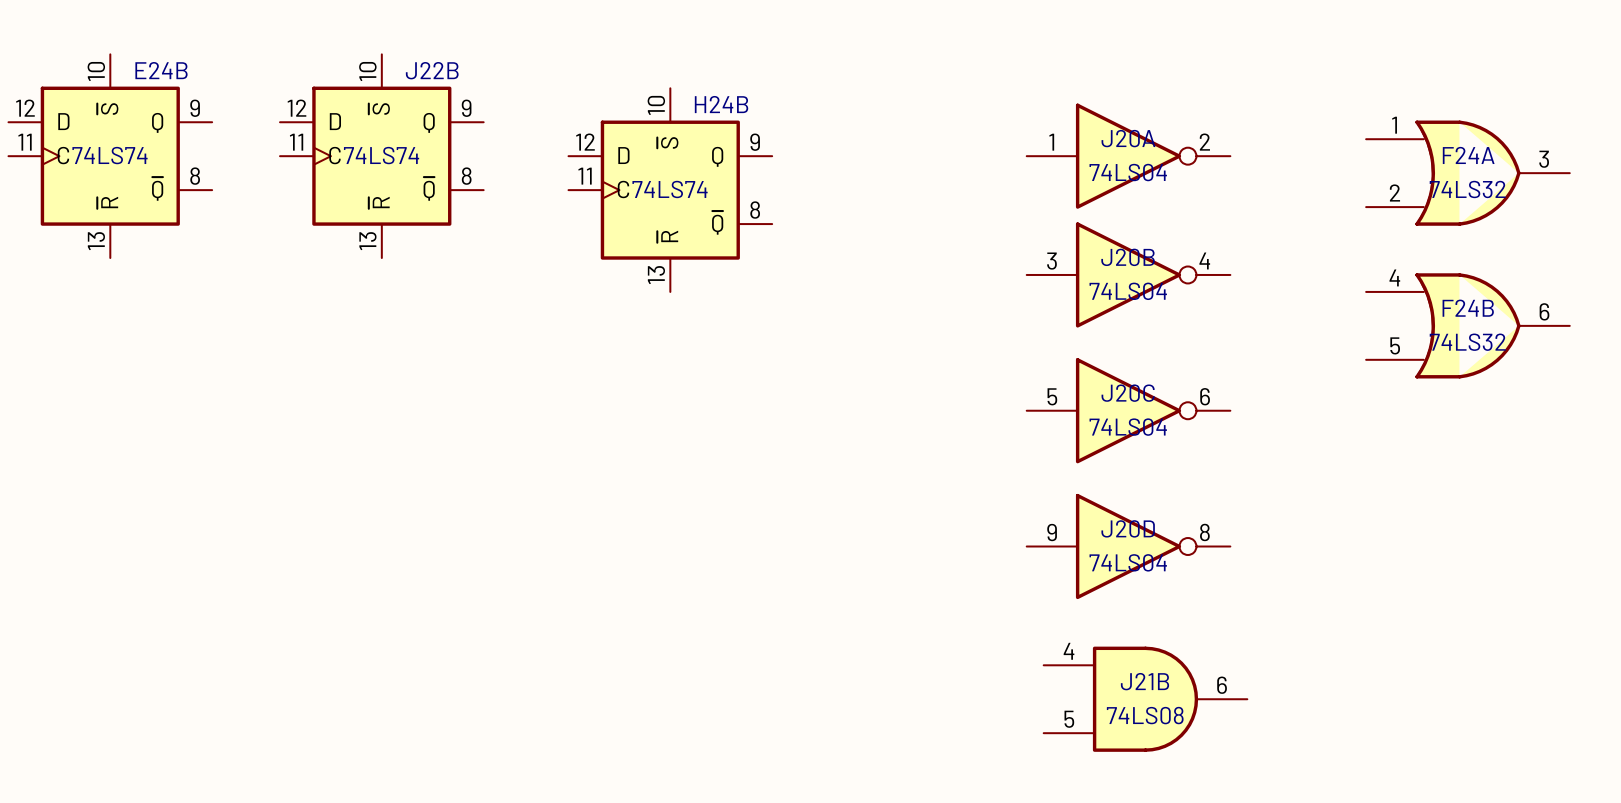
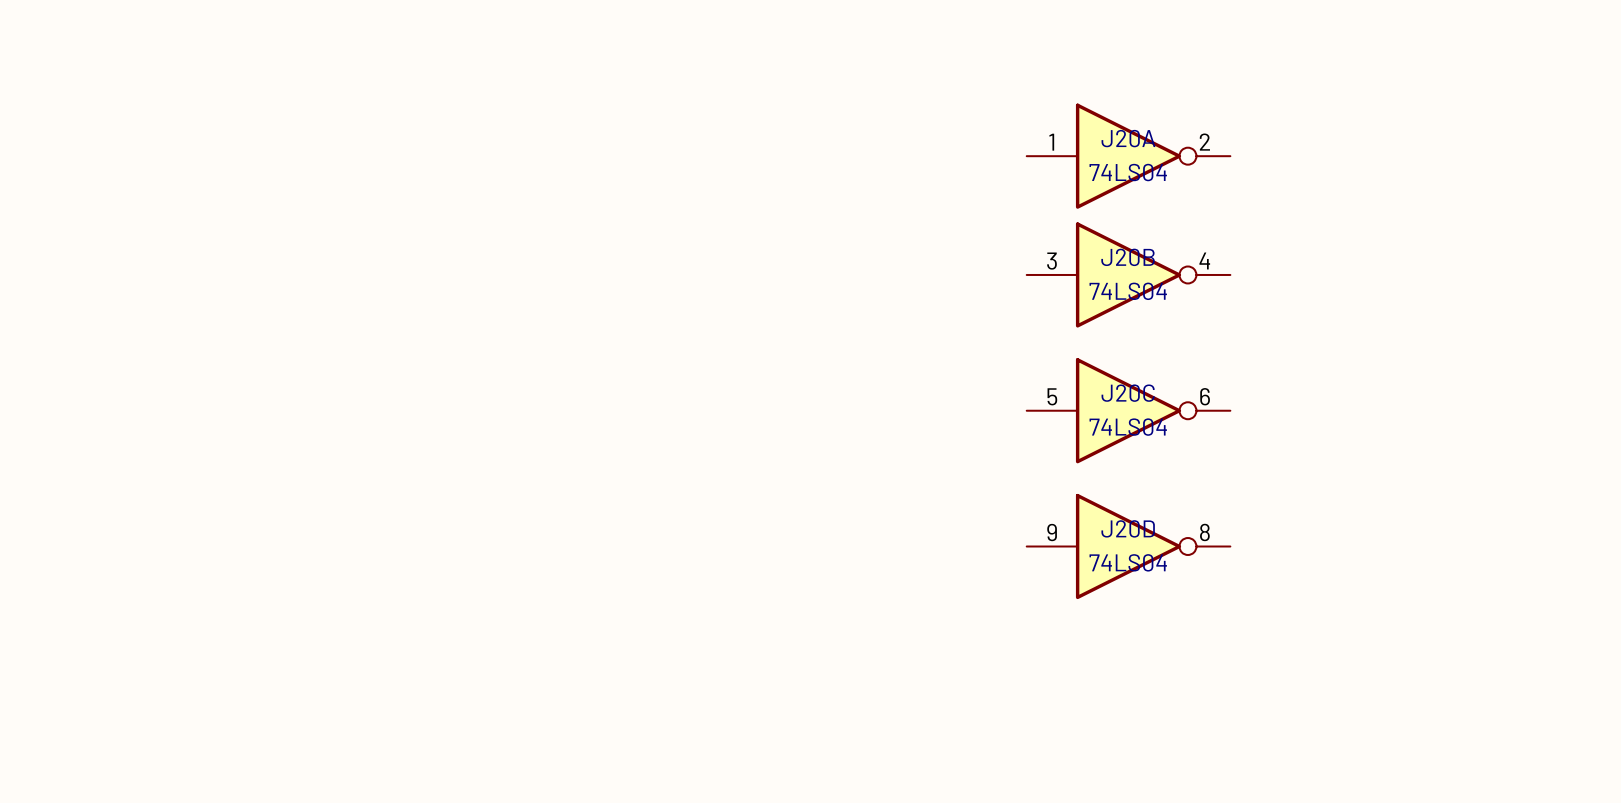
E24B: 74LS74 (110, 156) -> none
J22B: 74LS74 (381, 156) -> none
F24A: 74LS32 (1467, 173) -> none
H24B: 74LS74 (670, 190) -> none
F24B: 74LS32 (1467, 325) -> none
J21B: 74LS08 (1145, 699) -> none

